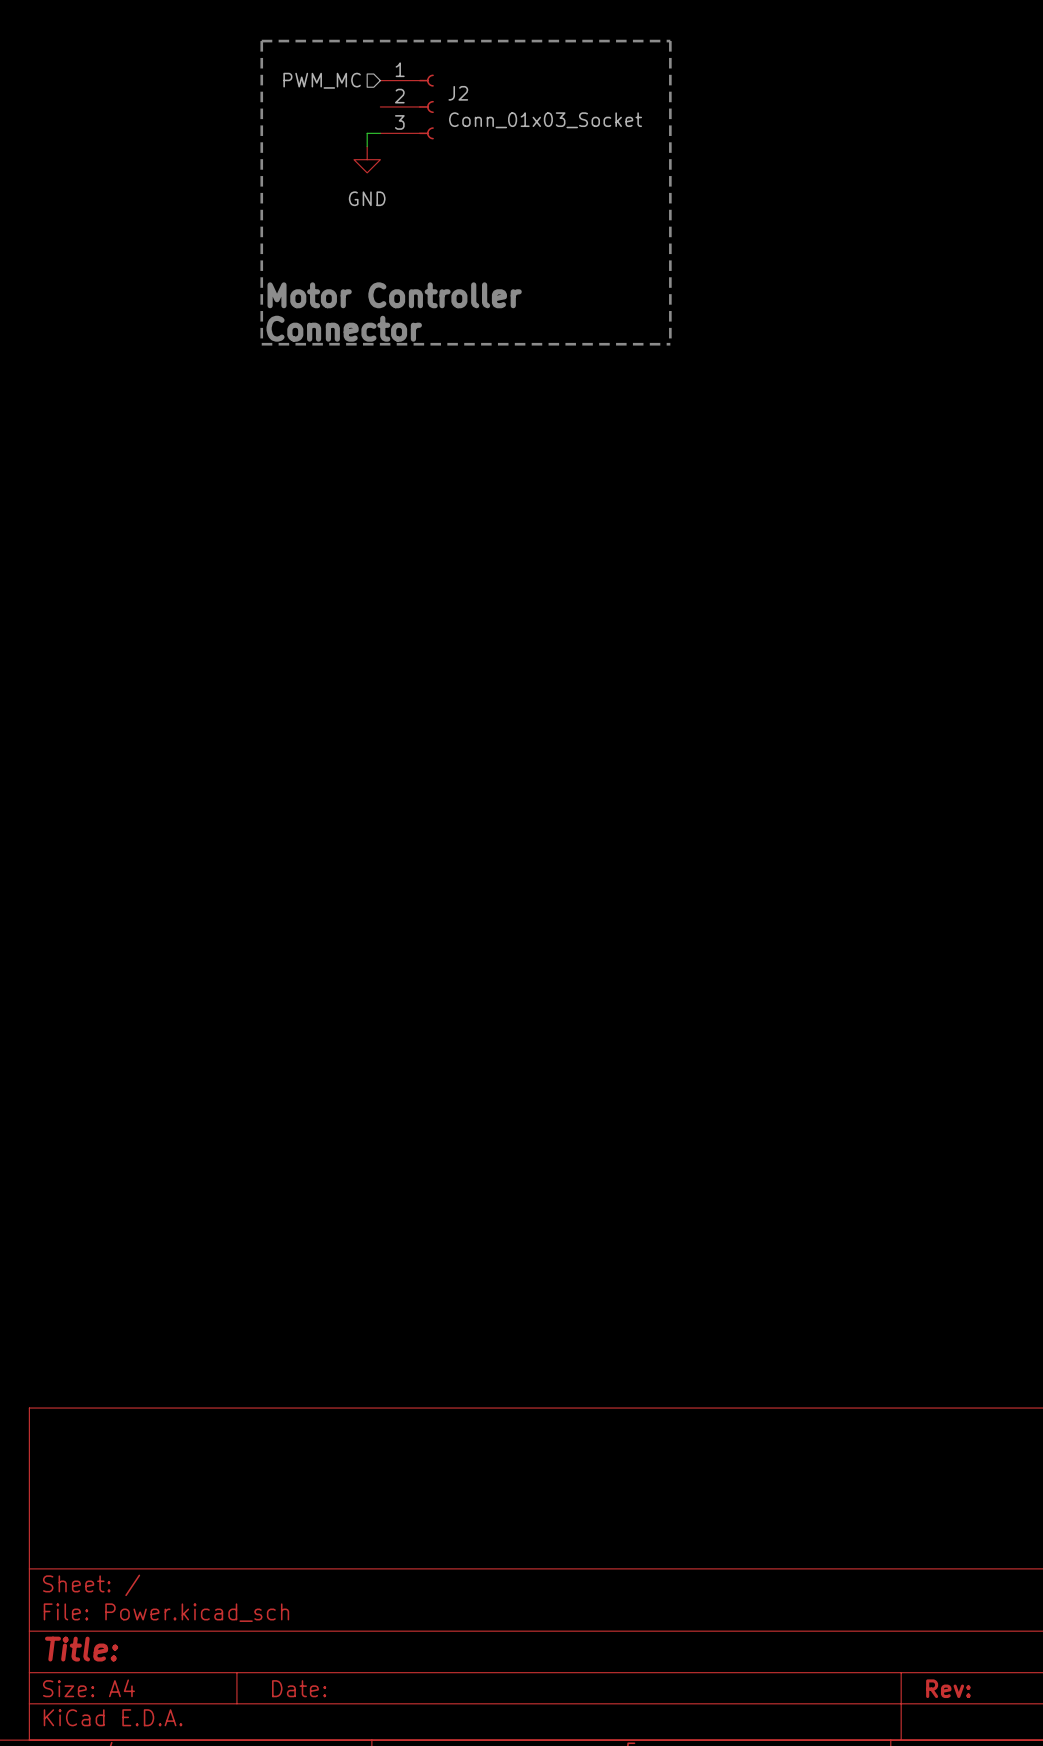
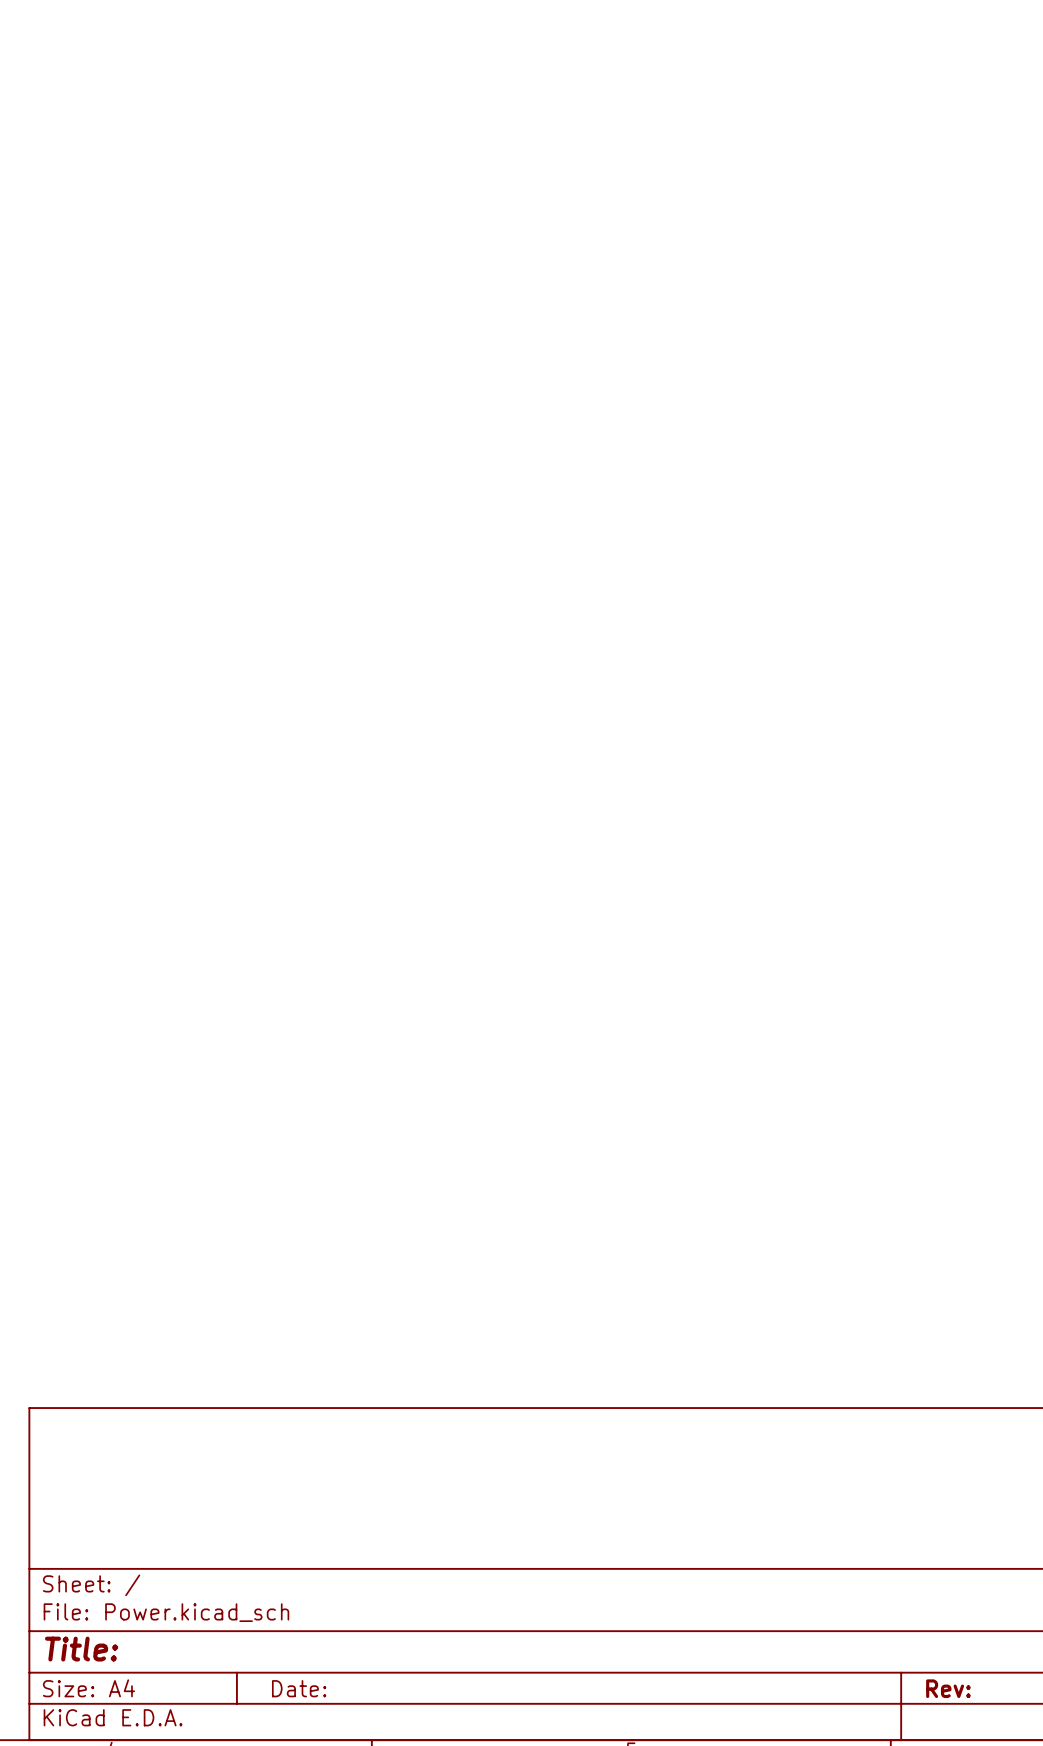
line: (261, 41) (670, 41) (670, 344) (261, 344) (261, 41) -> none
hierarchical label: PWM_MC (322, 80) -> none
J2: Conn_01x03_Socket (407, 106) -> none
wire: (380, 133) (367, 133) (367, 146) -> none
power symbol: GND (367, 159) -> none
text: Motor Controller (394, 295) -> none
text: Connector (344, 328) -> none

